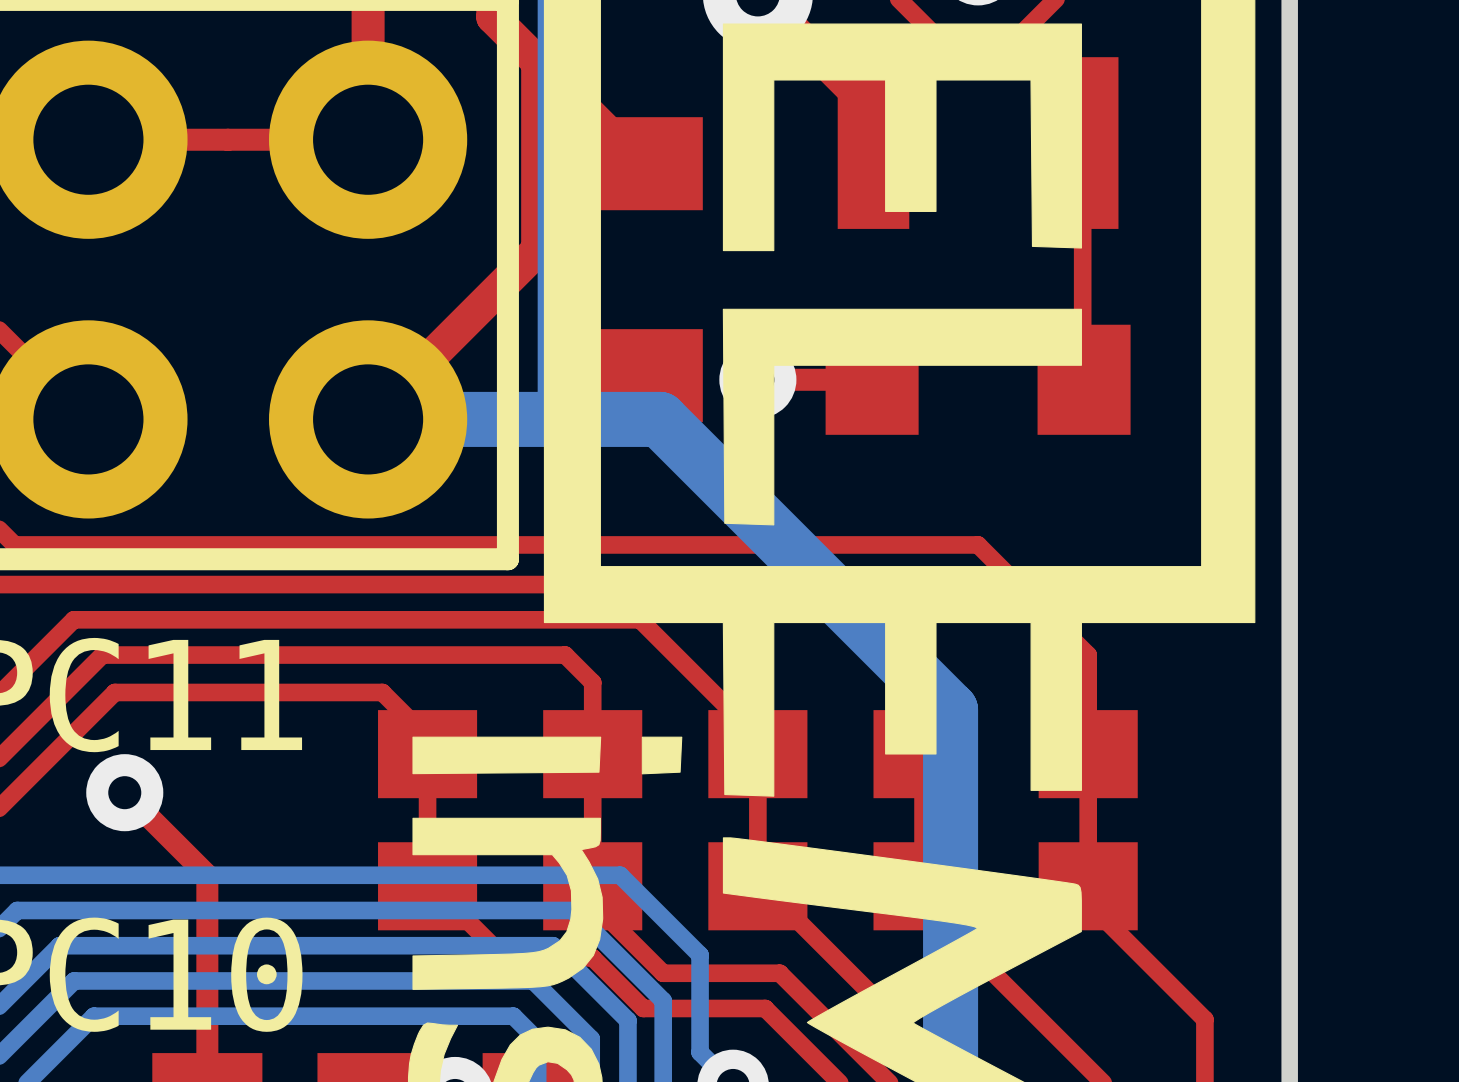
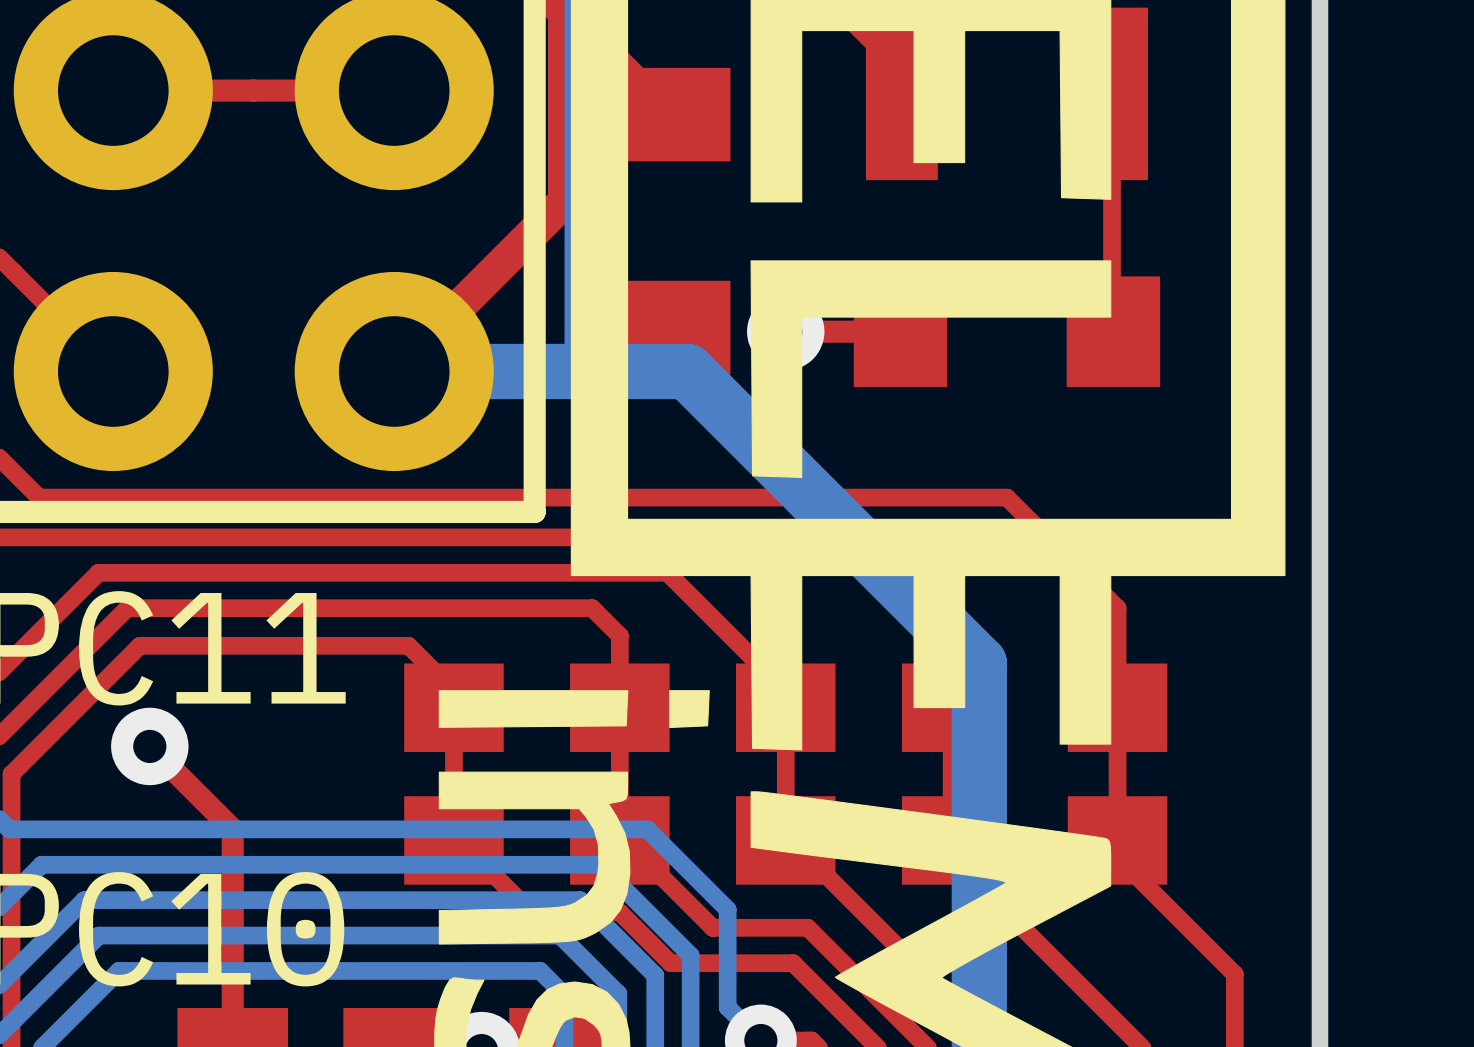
top track: (592, 902) (663, 973) (685, 973) -> (619, 857) (641, 857) (712, 927)

